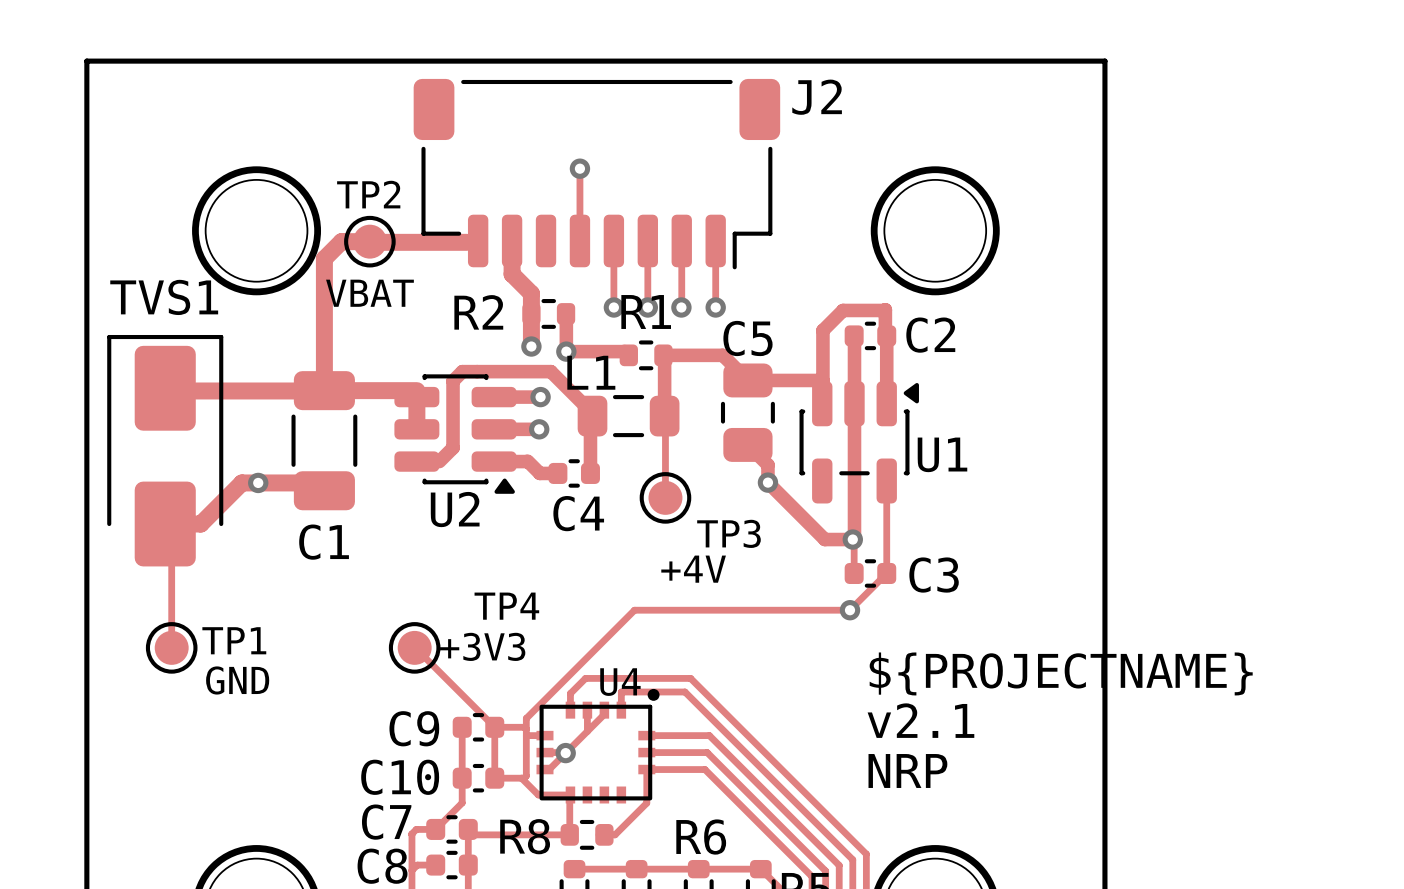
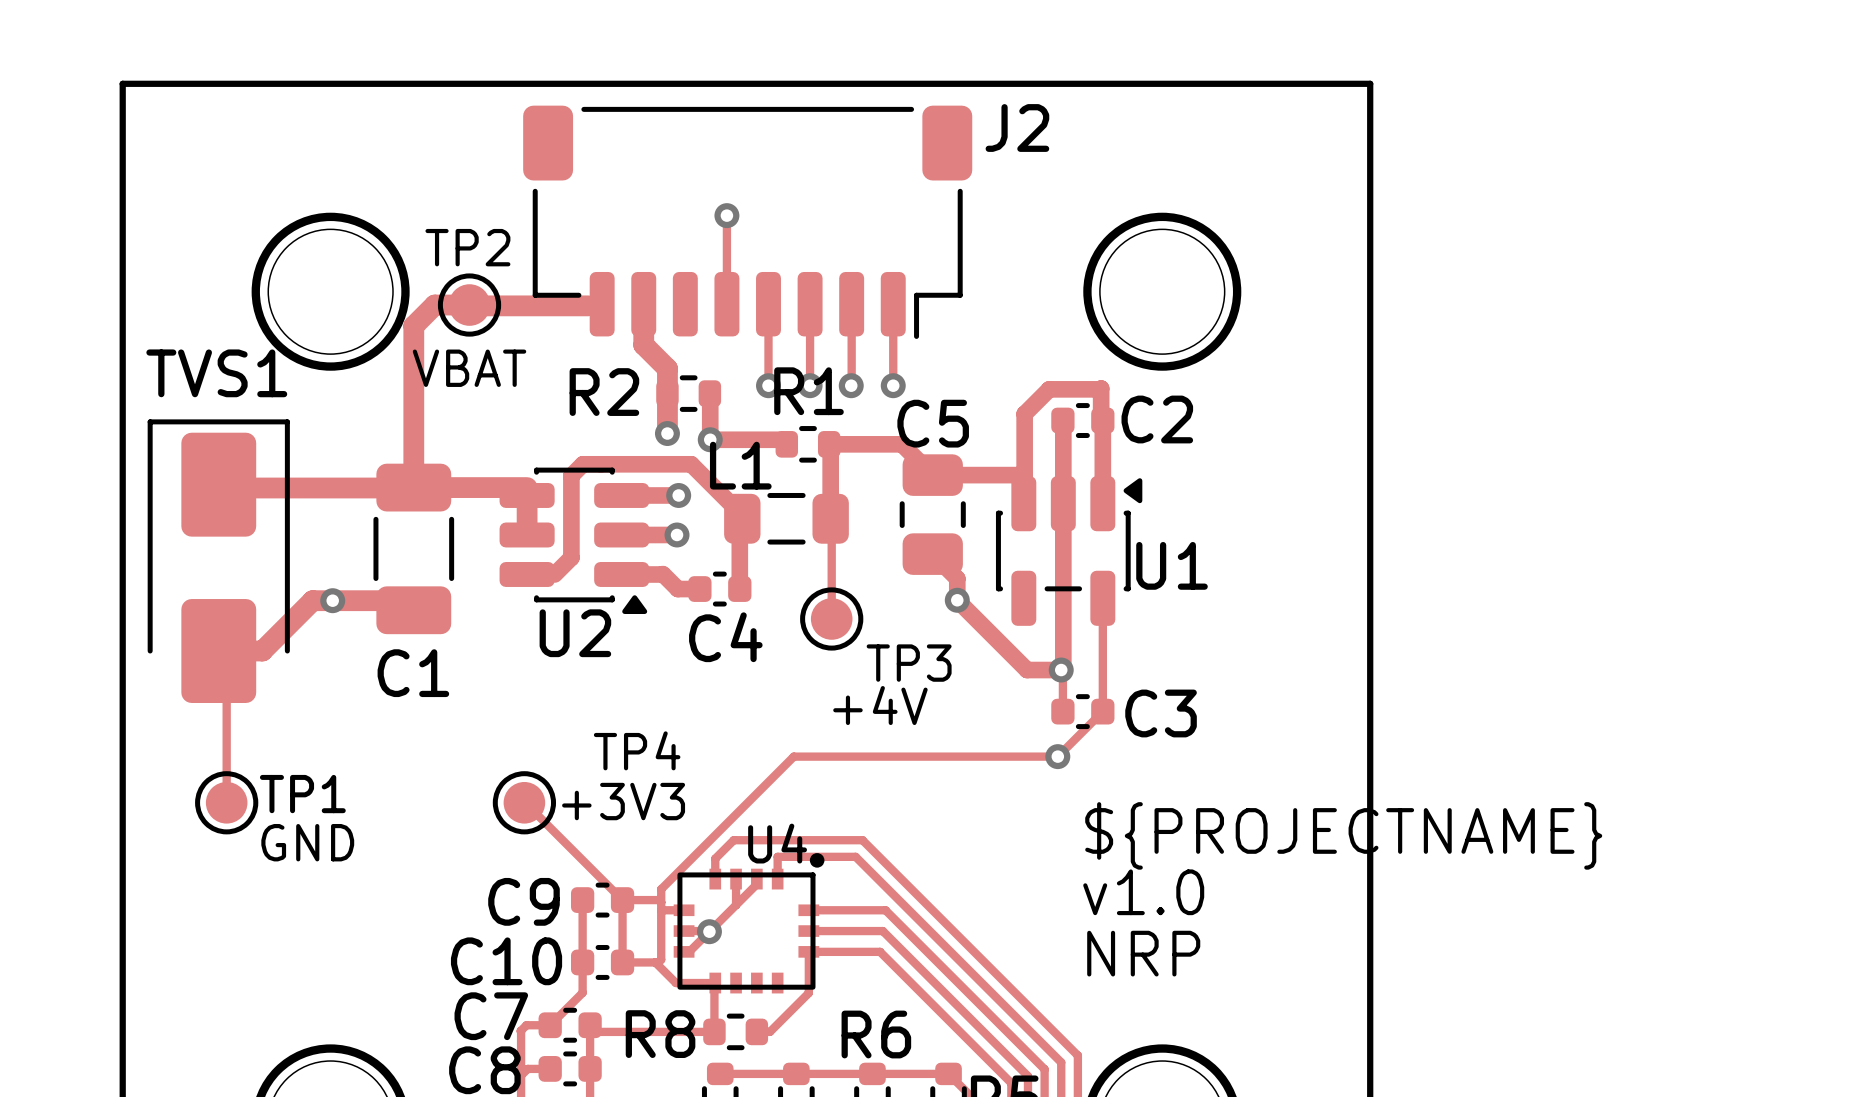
text: v2.1 (920, 720) -> v1.0 (1143, 892)

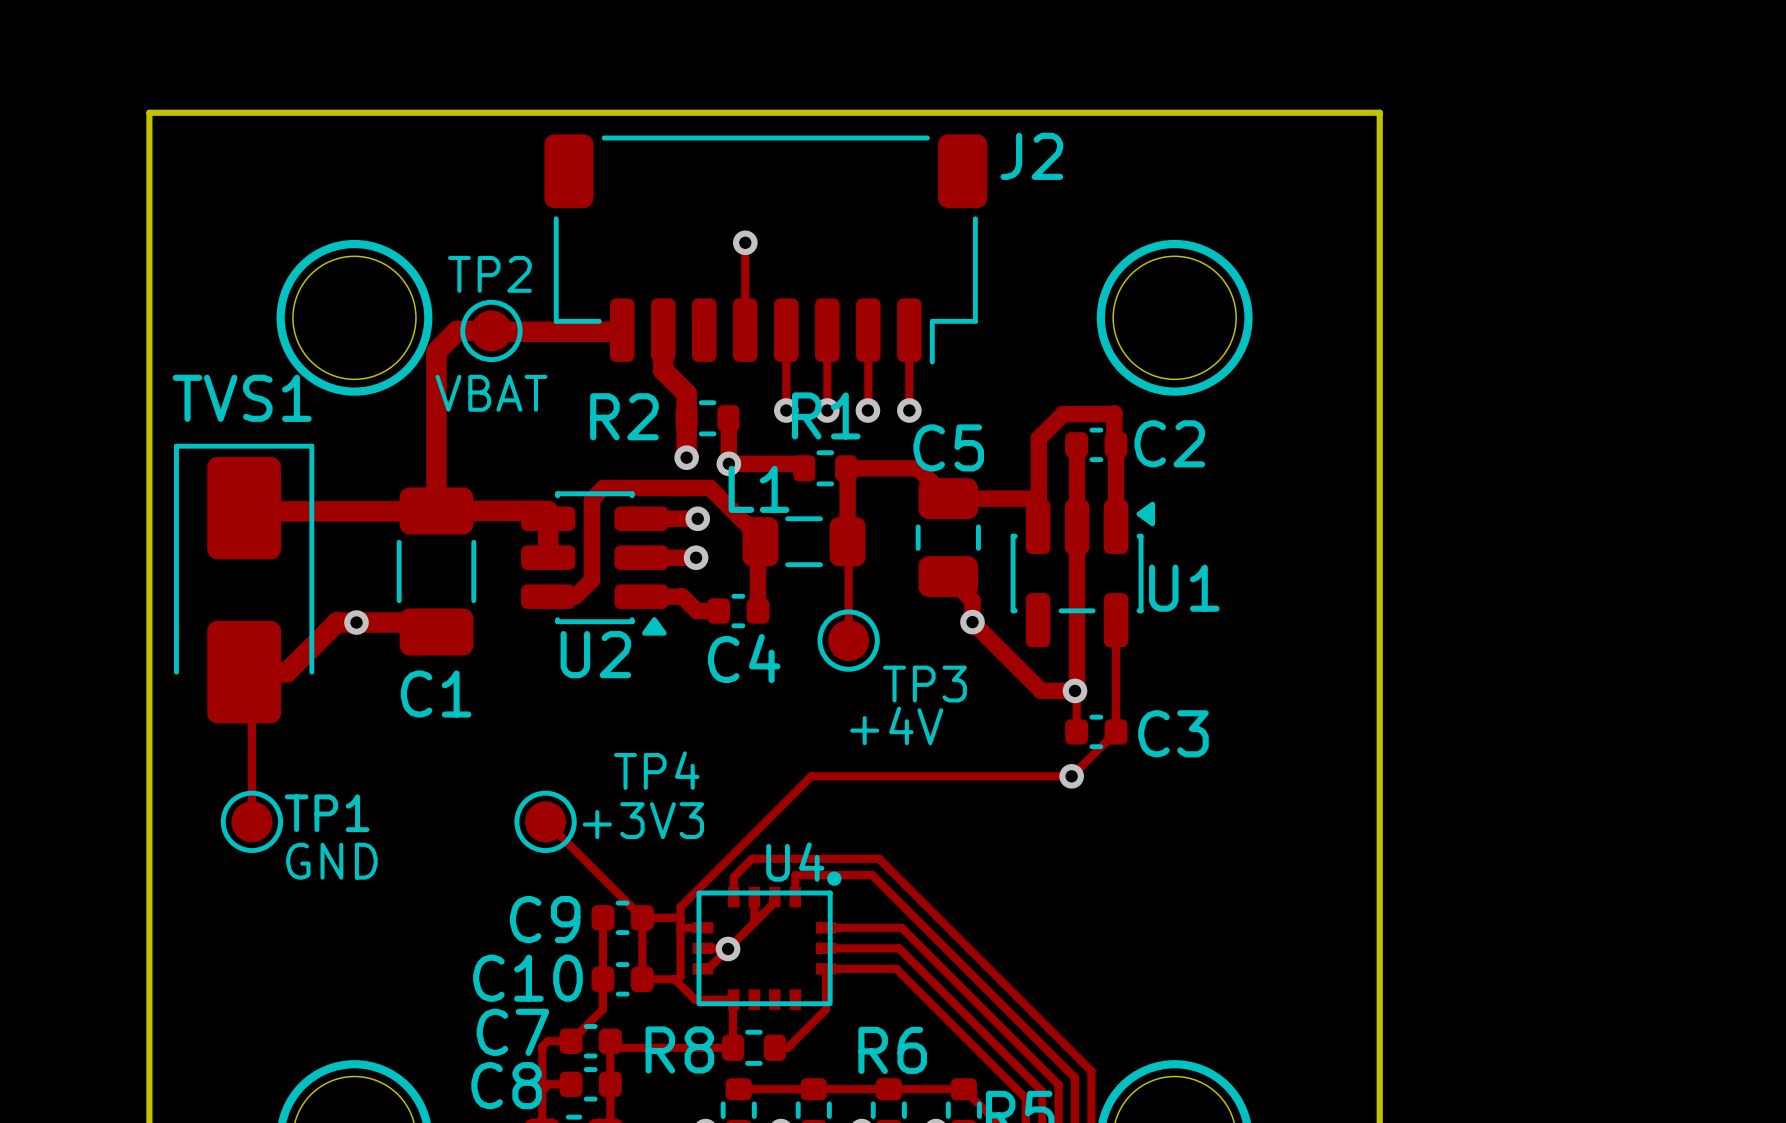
text: ${PROJECTNAME} (1343, 835) -> none
text: v1.0 (1143, 892) -> none
text: NRP (1143, 953) -> none

